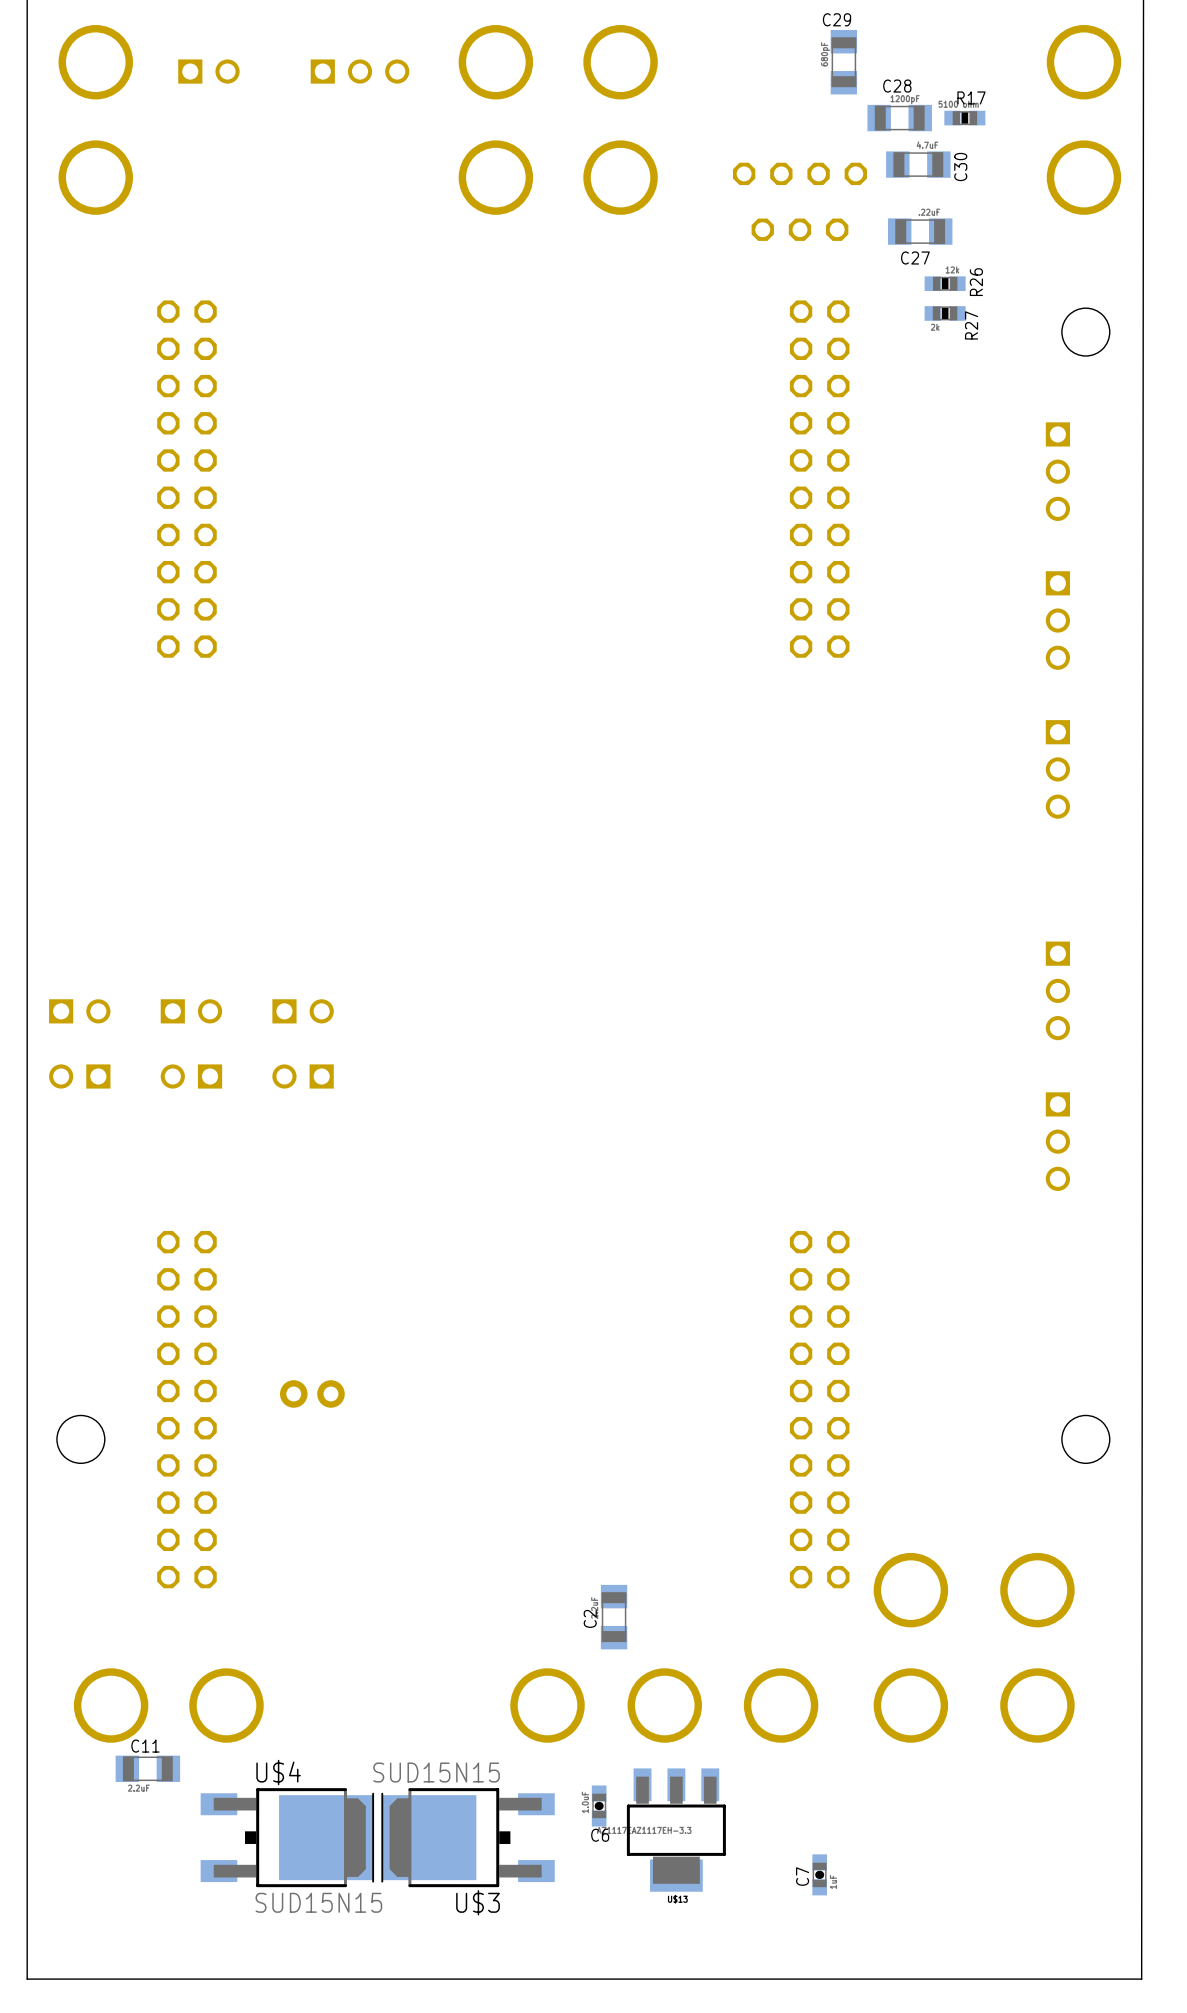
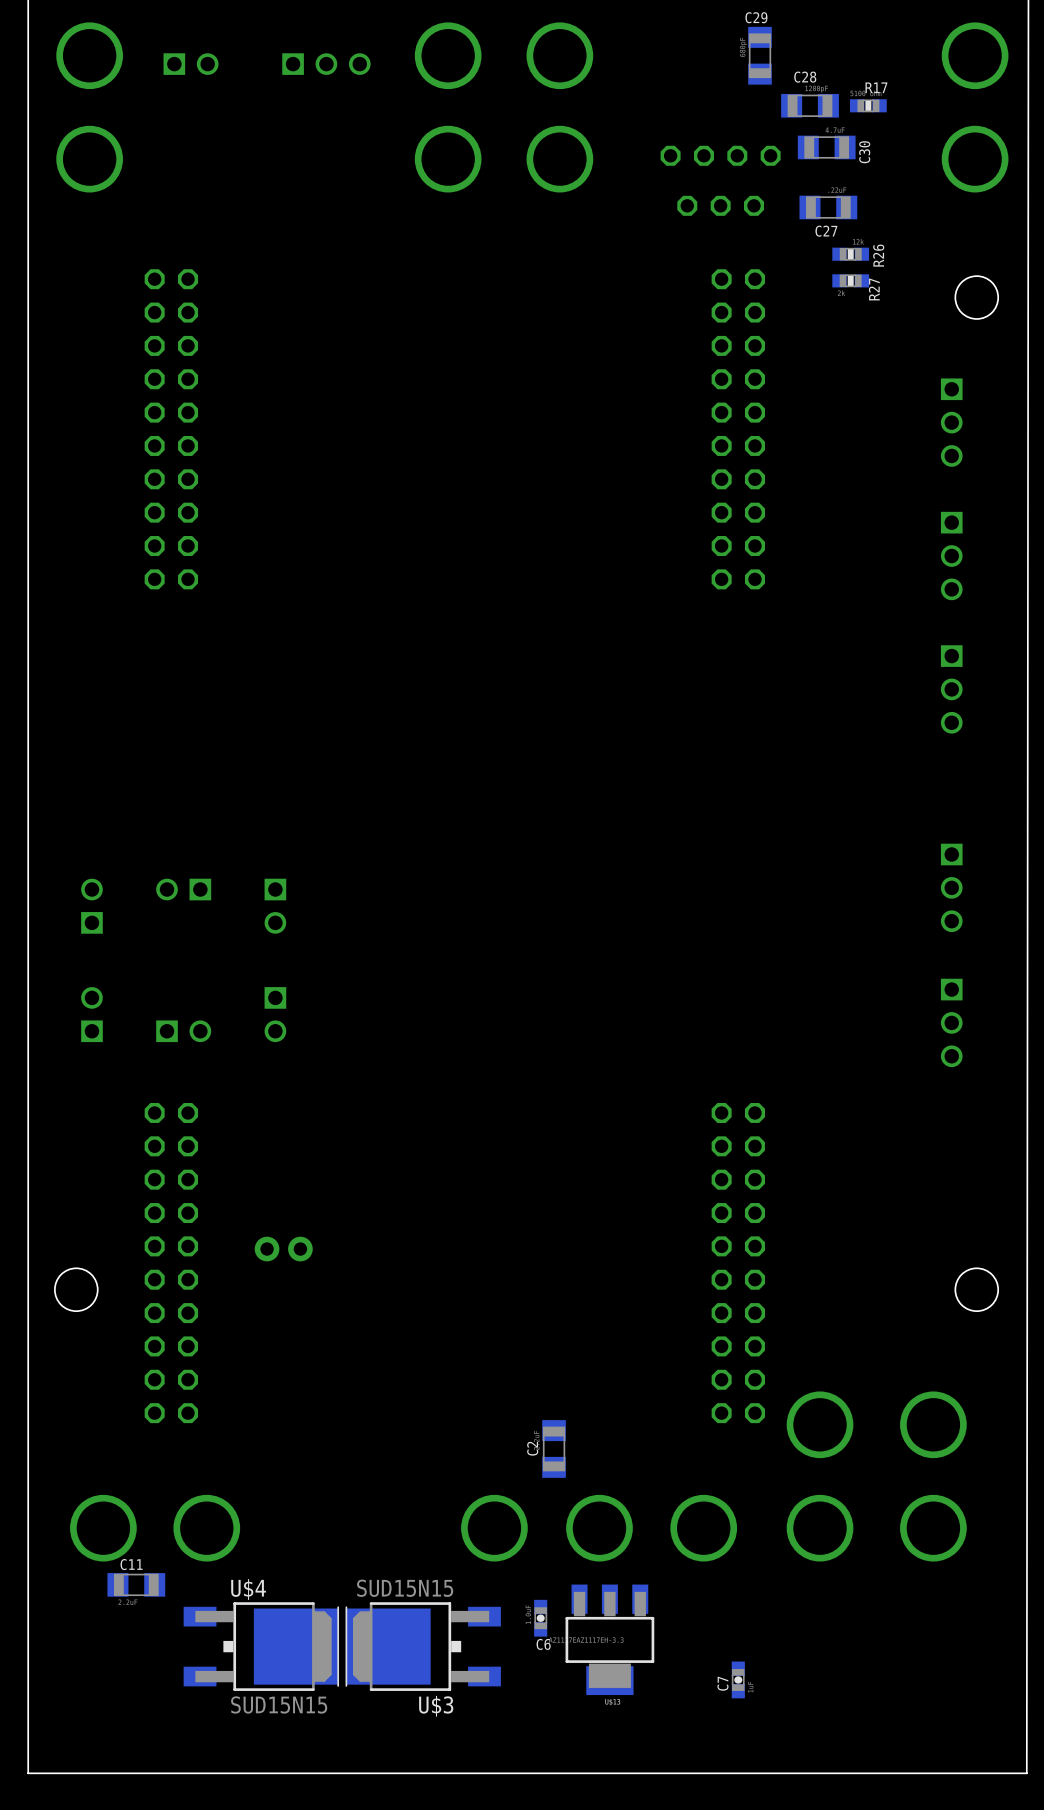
part rotation: 0° (79, 1011) -> 90° counterclockwise (91, 906)
part rotation: 0° (191, 1011) -> 180° (183, 889)
part rotation: 0° (303, 1011) -> 90° clockwise (275, 906)
part: (79, 1076) -> none
part: (191, 1076) -> none
part rotation: 0° (303, 1076) -> 90° counterclockwise (275, 1014)
part position: (303, 1076) -> (275, 1014)
part: none -> (91, 1014)
part: none -> (183, 1031)

